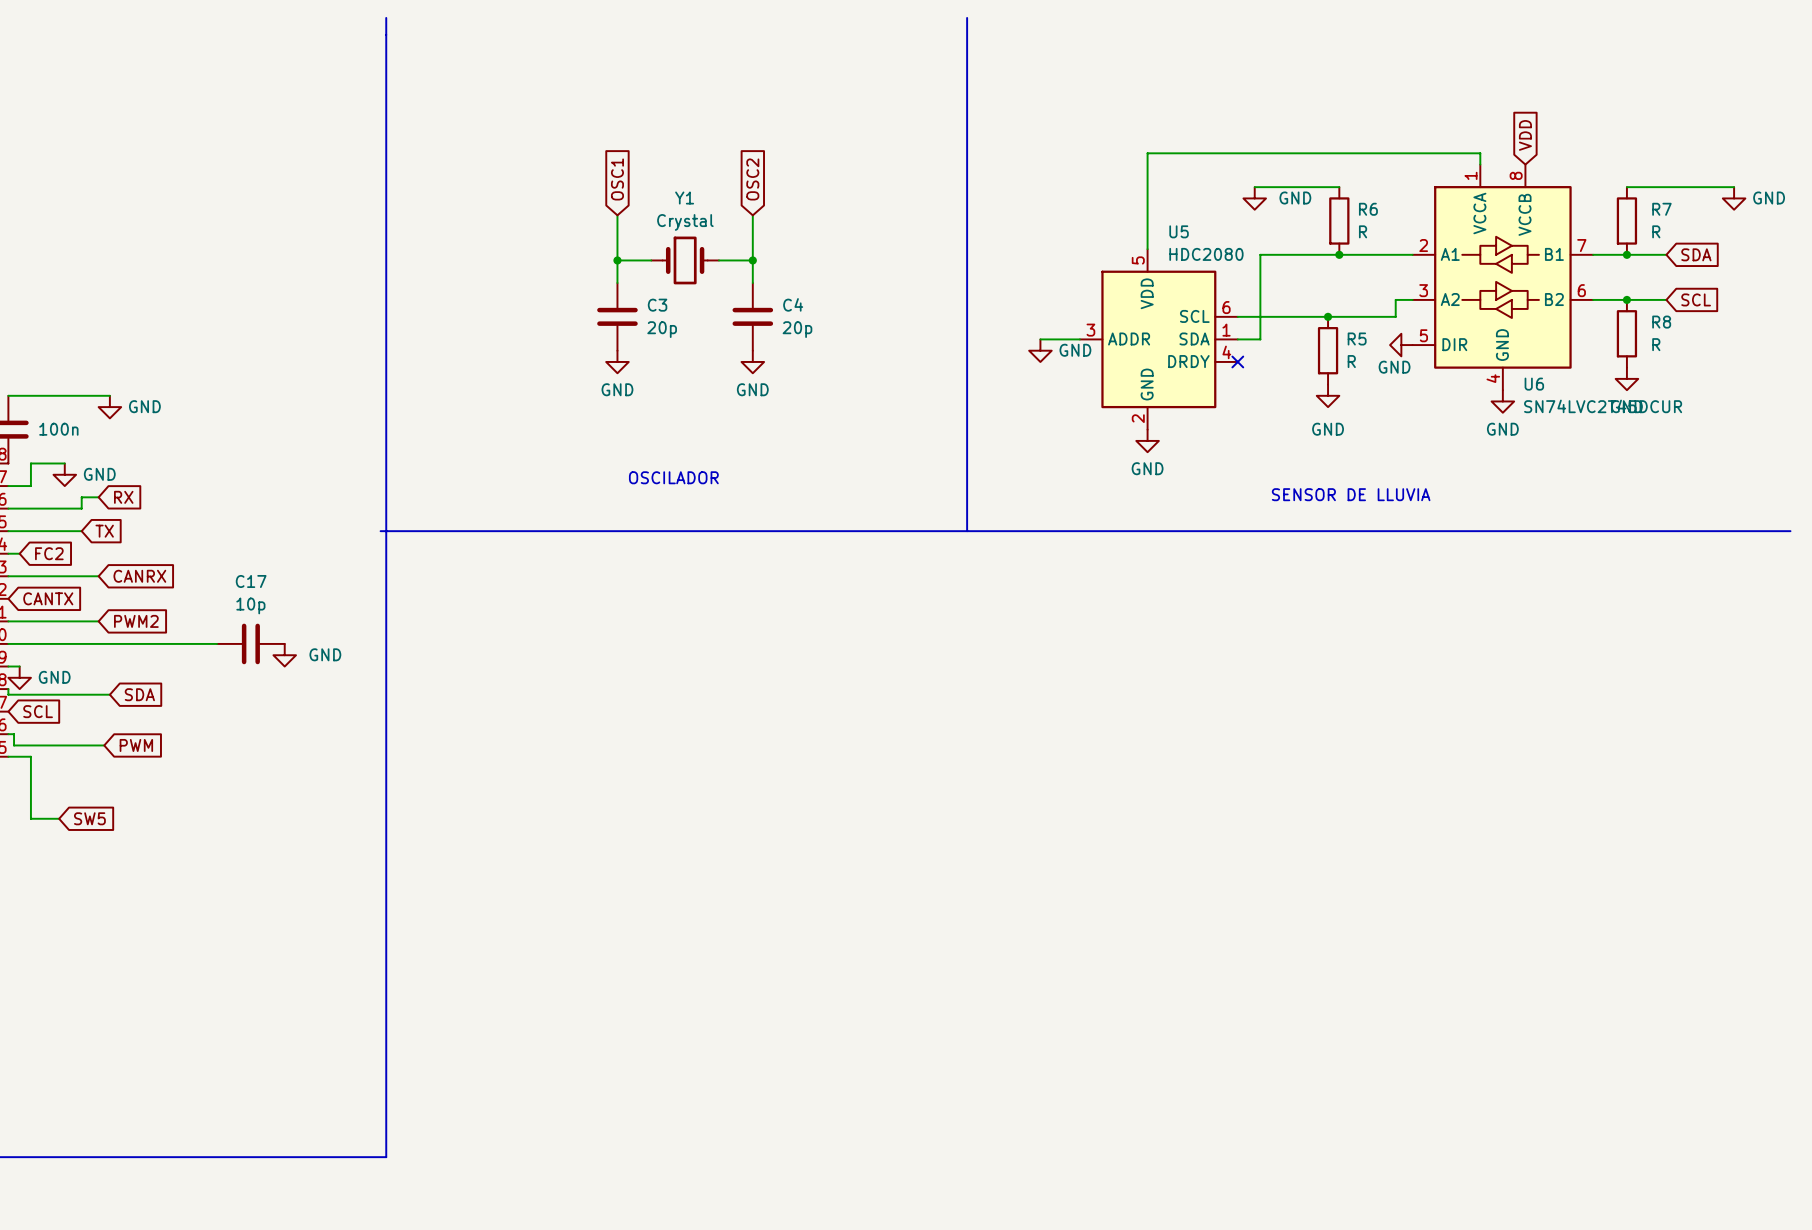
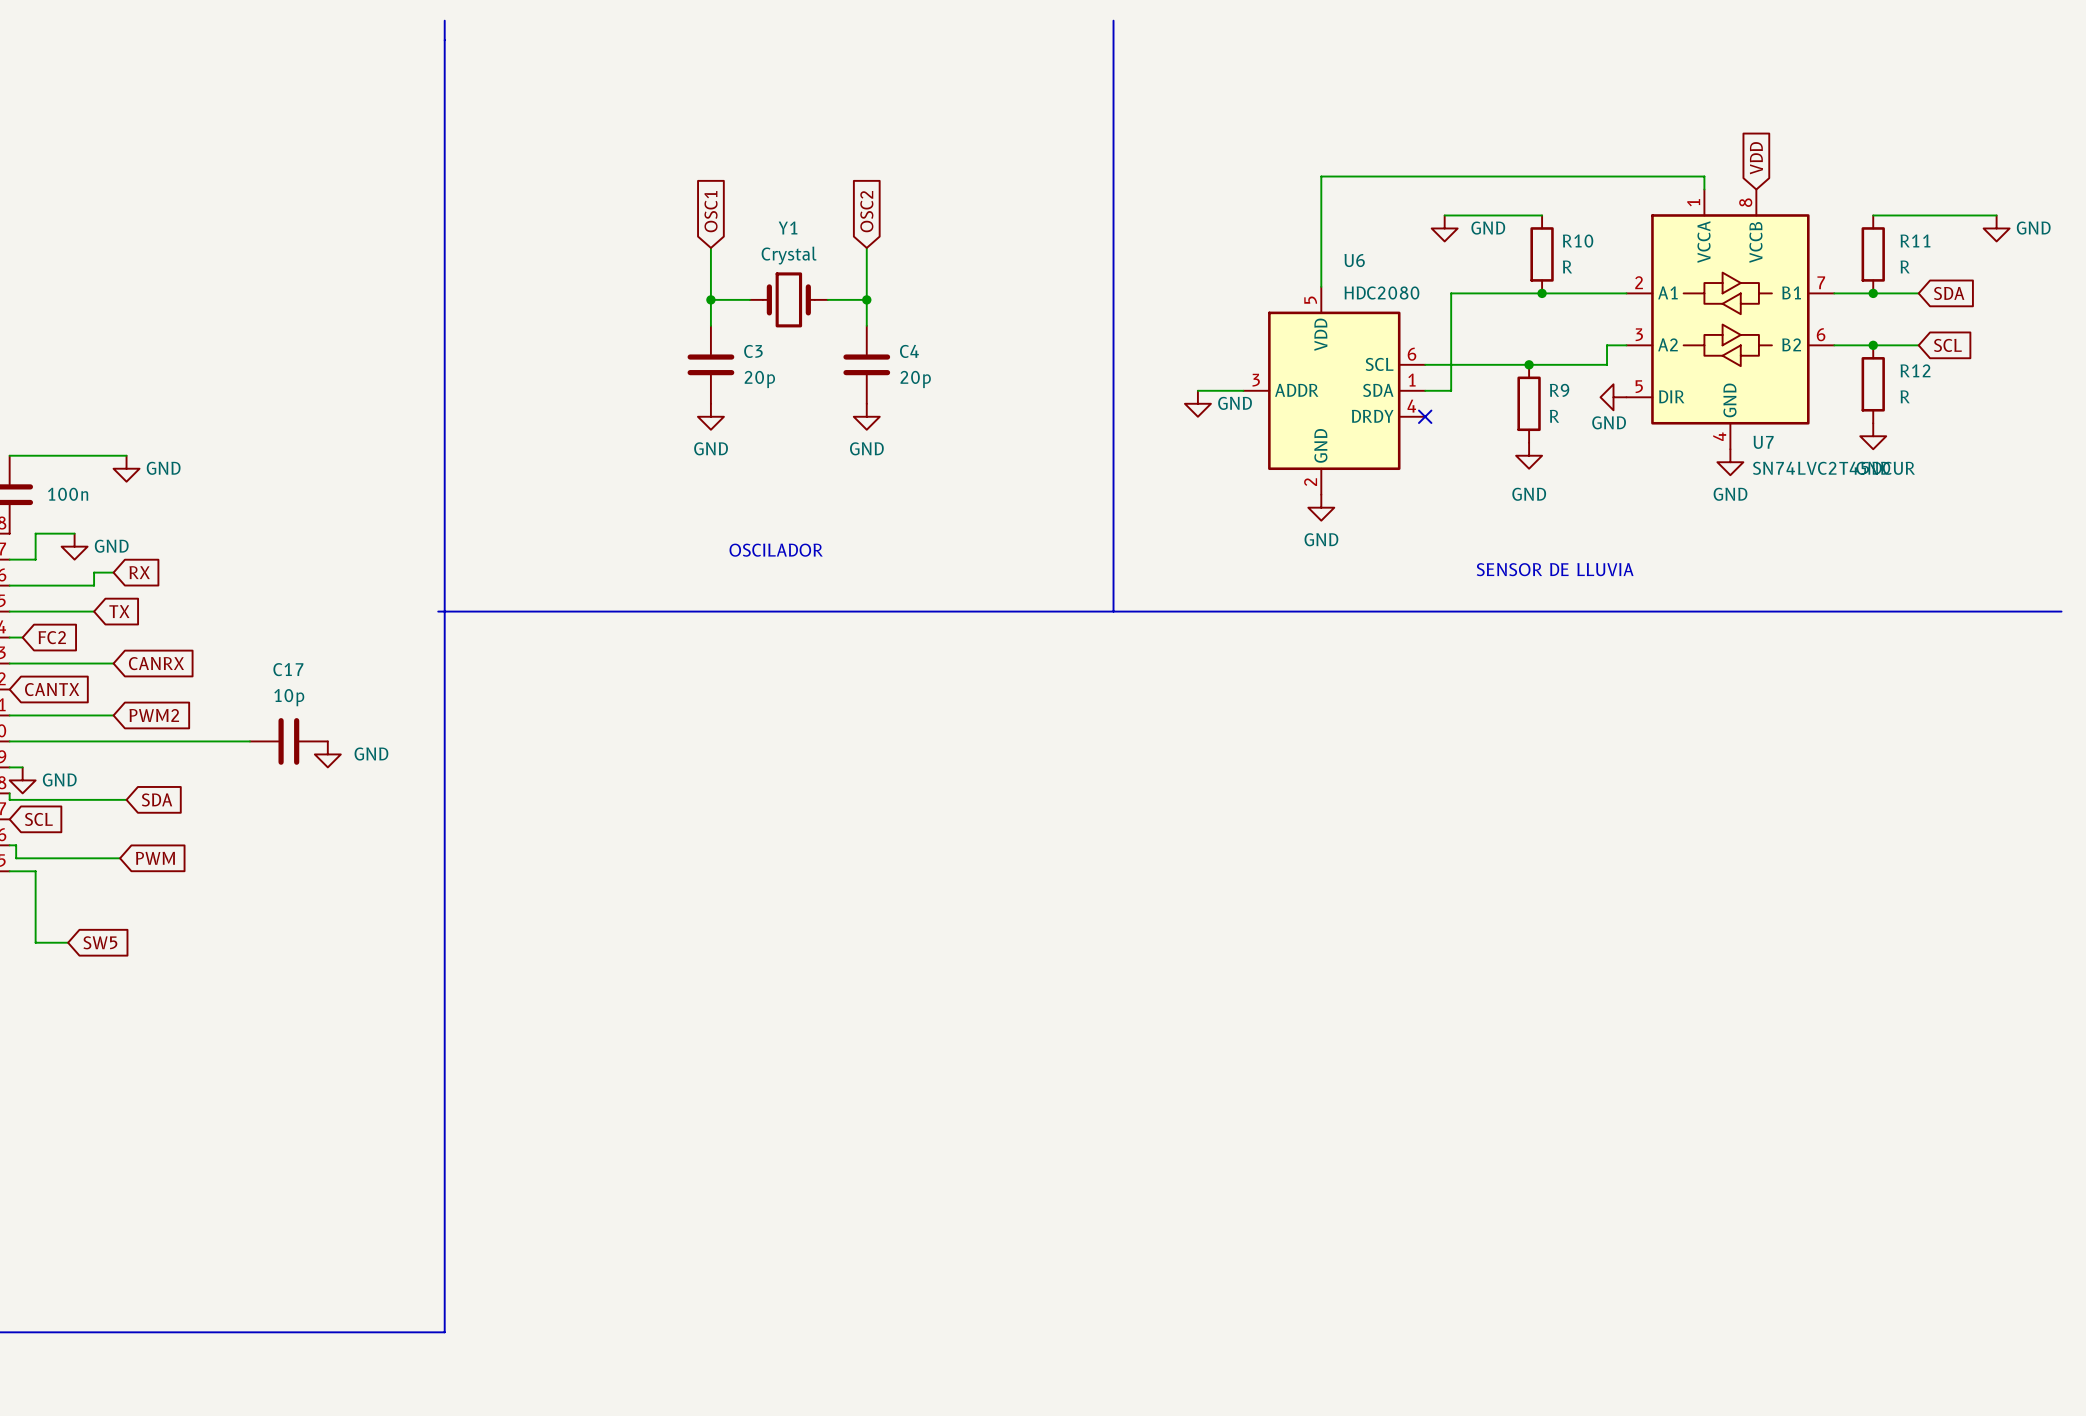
R6 name: R6 (1368, 209) -> R10 (1578, 241)
R7 name: R7 (1661, 209) -> R11 (1915, 240)
U5 name: U5 (1179, 231) -> U6 (1354, 260)
R8 name: R8 (1661, 322) -> R12 (1915, 370)
R5 name: R5 (1357, 338) -> R9 (1559, 390)
U6 name: U6 (1534, 384) -> U7 (1763, 442)

